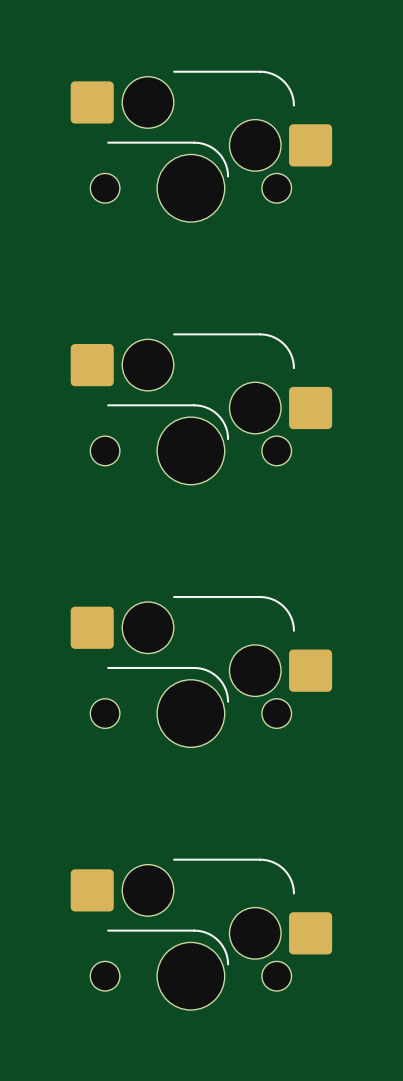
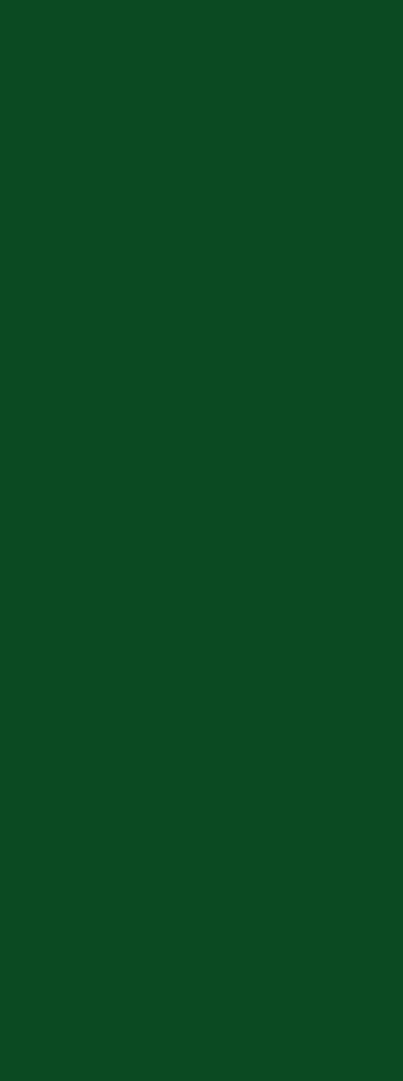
part: (201, 146) -> none
part: (201, 409) -> none
part: (201, 671) -> none
part: (201, 934) -> none

